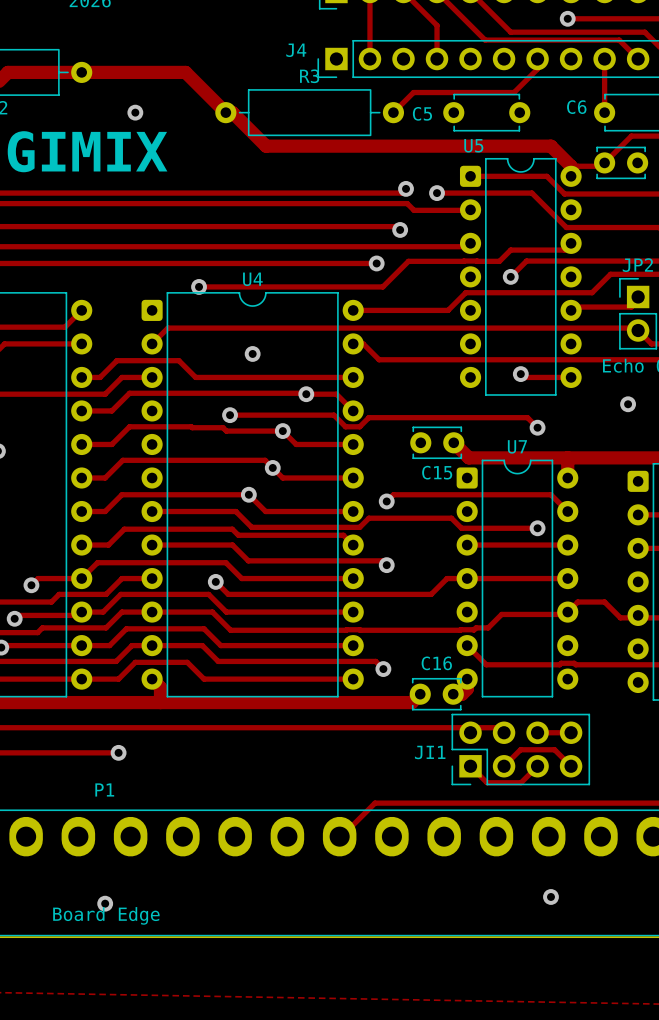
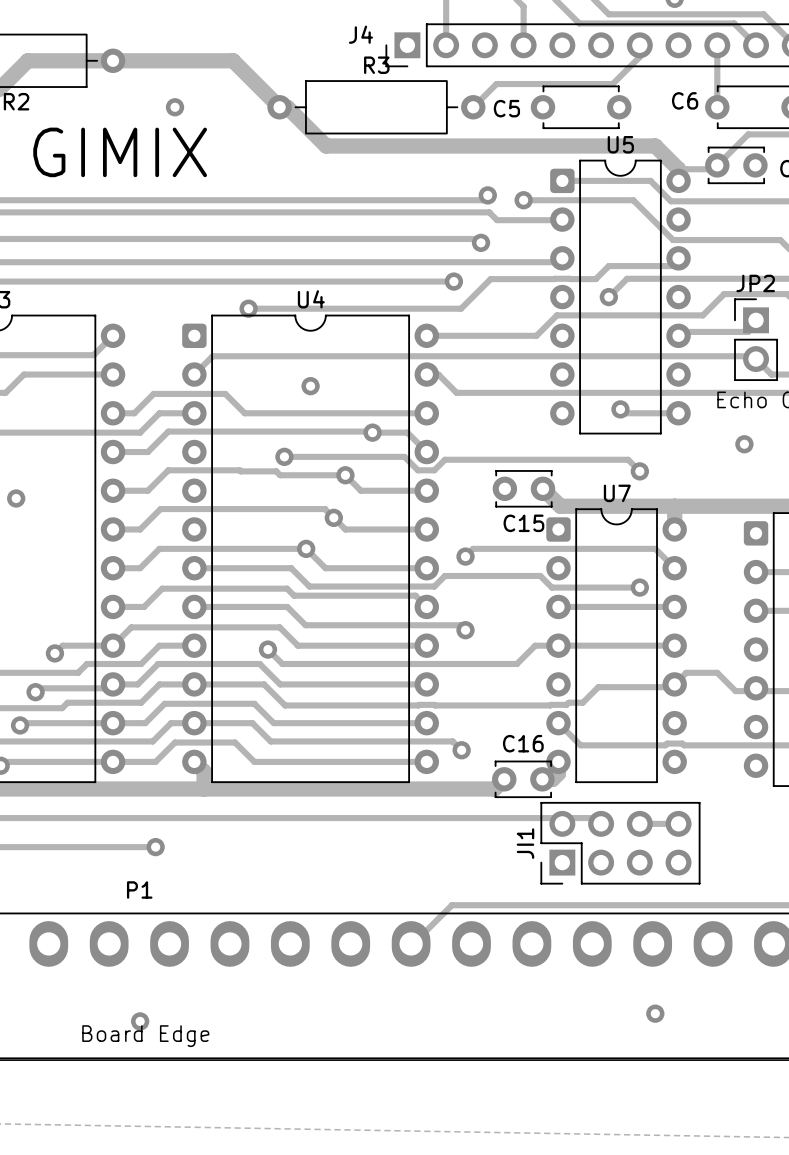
U5 name position: U5 (473, 145) -> U5 (620, 144)
JI1 name rotation: 0° (430, 752) -> 90° counterclockwise (525, 843)
track: (470, 766) (487, 782) (521, 782) (537, 766) -> none
track: (504, 766) (520, 749) (554, 749) (571, 766) -> none

